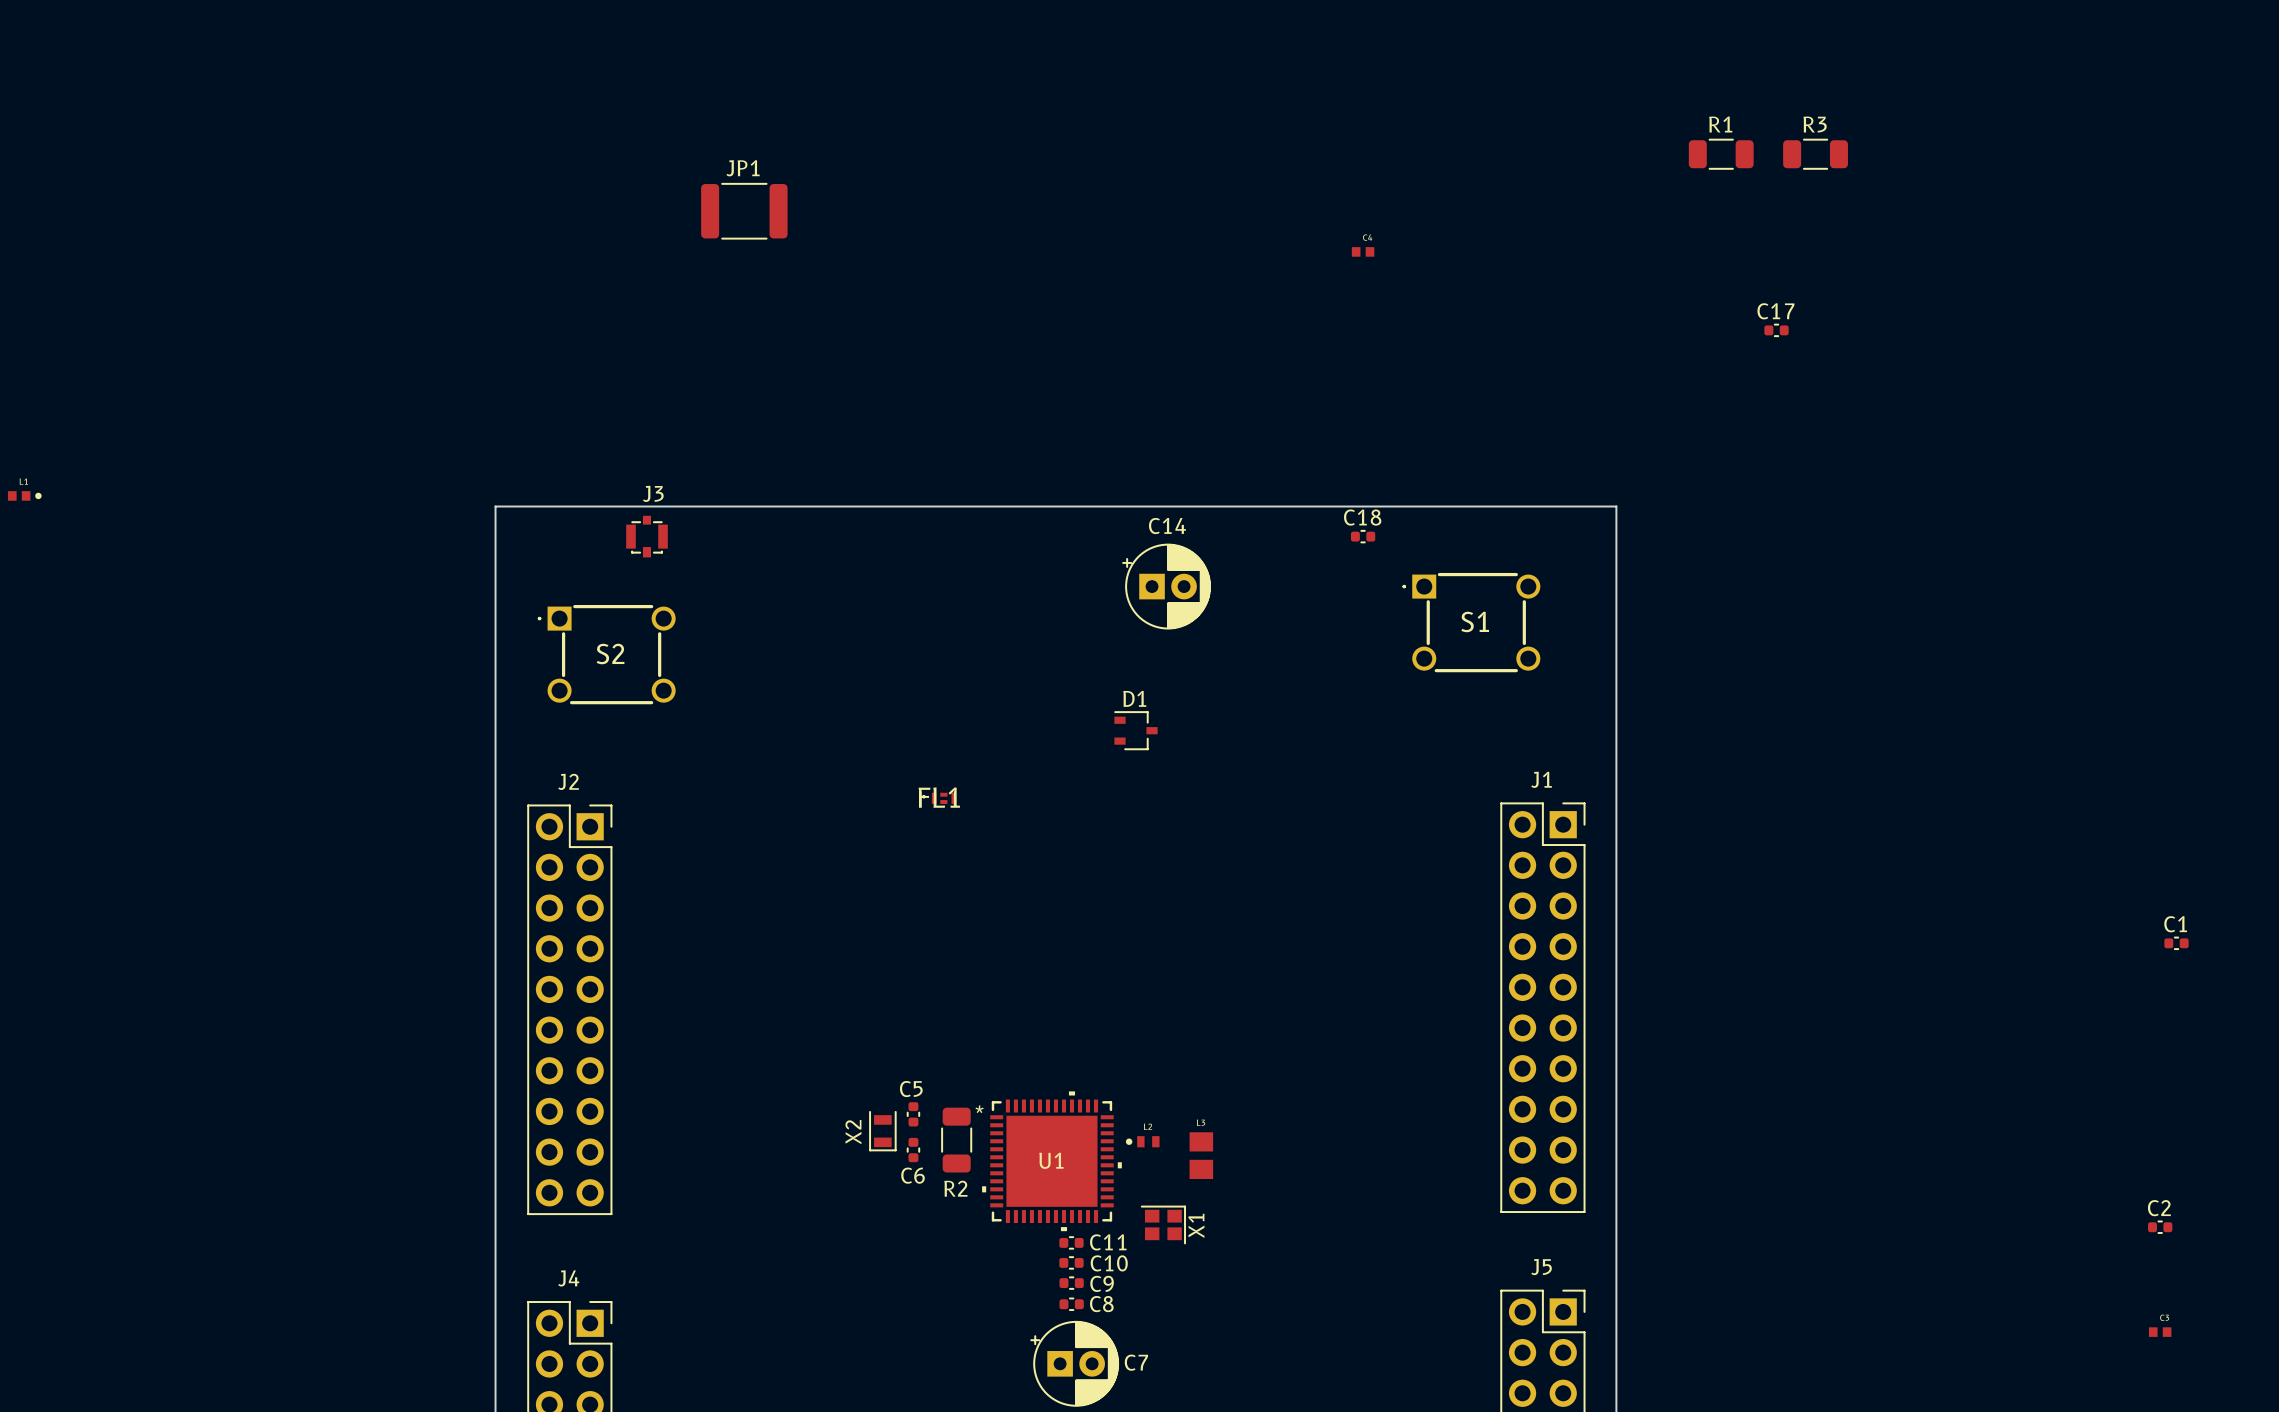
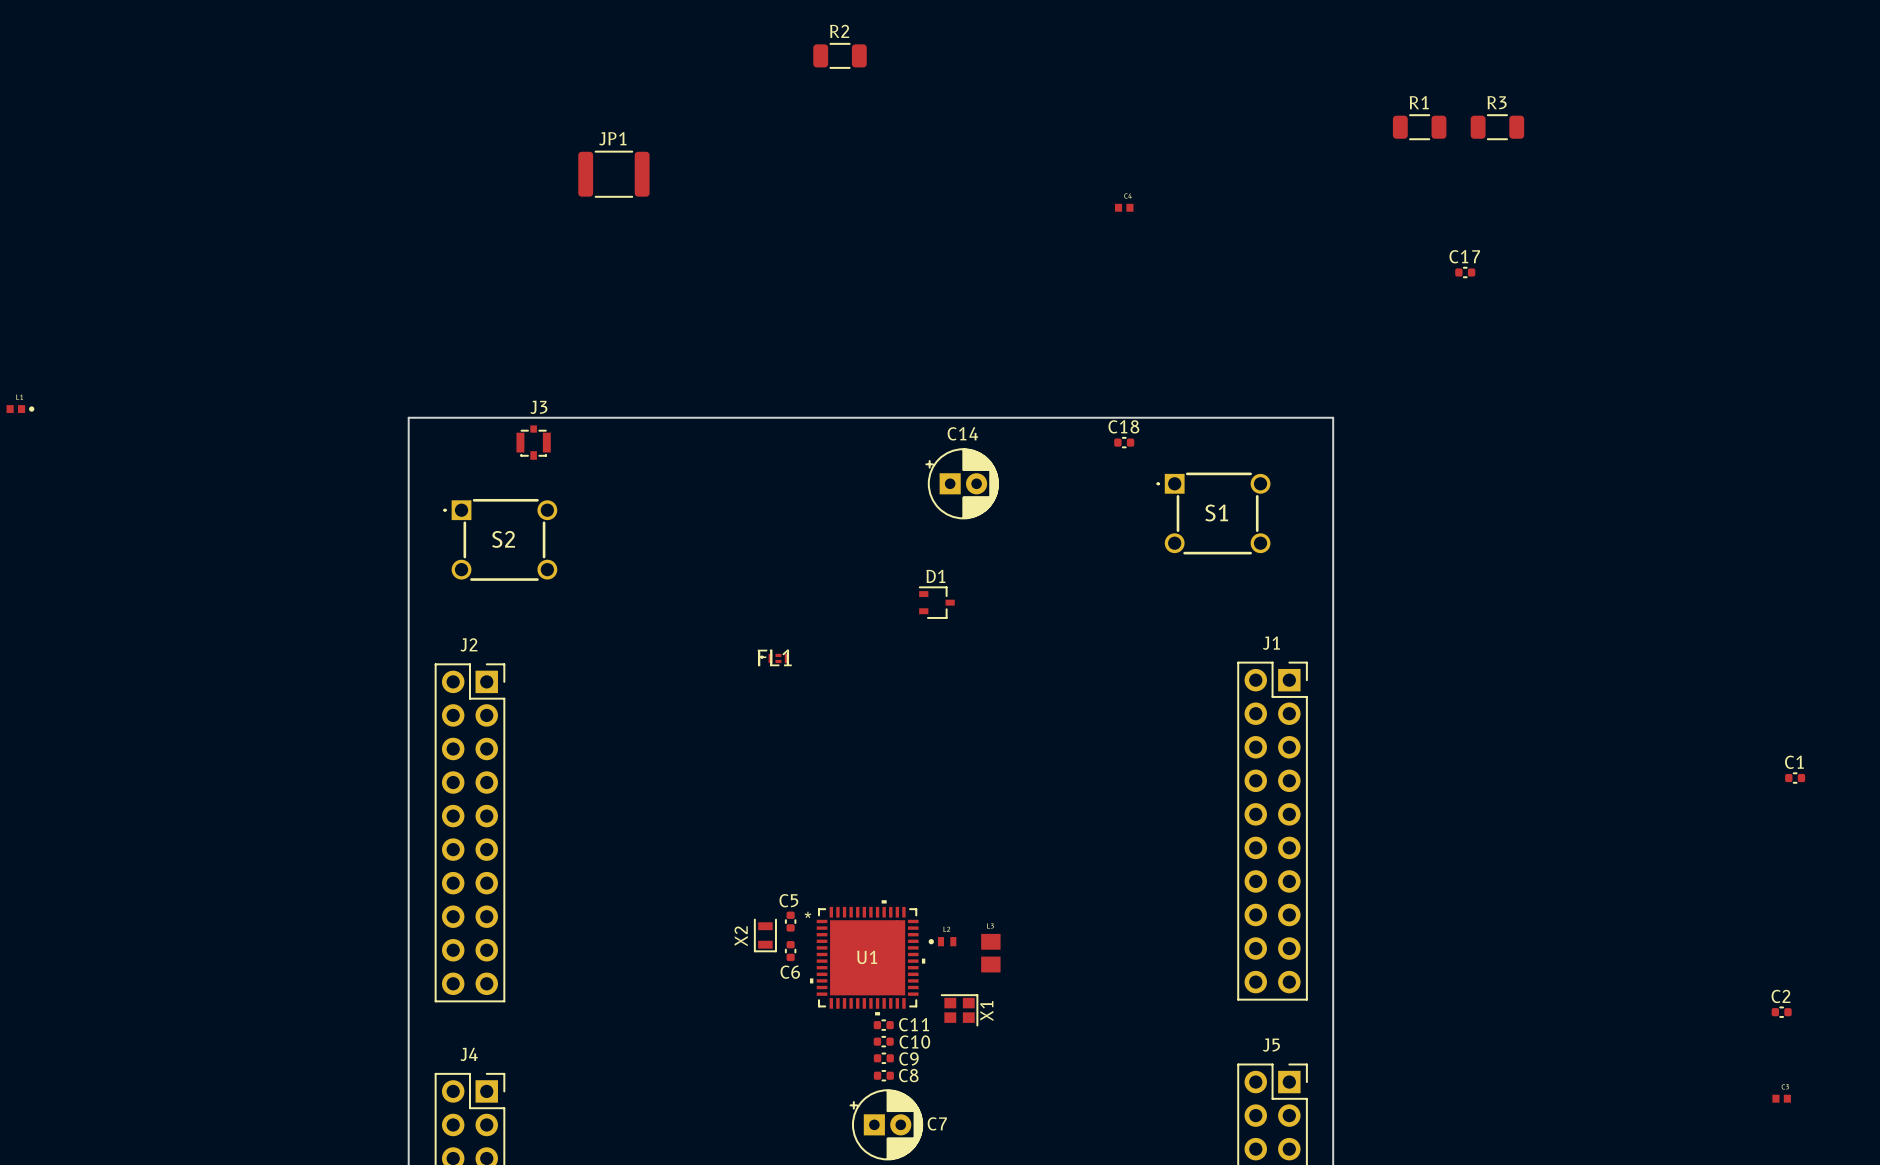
C5 position: (913, 1114) -> (790, 921)
X2 position: (882, 1131) -> (765, 935)
R2 rotation: 0° (956, 1140) -> 90° clockwise (840, 55)
R2 position: (956, 1140) -> (840, 55)
C6 position: (913, 1150) -> (790, 951)
R2 name position: R2 (955, 1188) -> R2 (839, 31)

